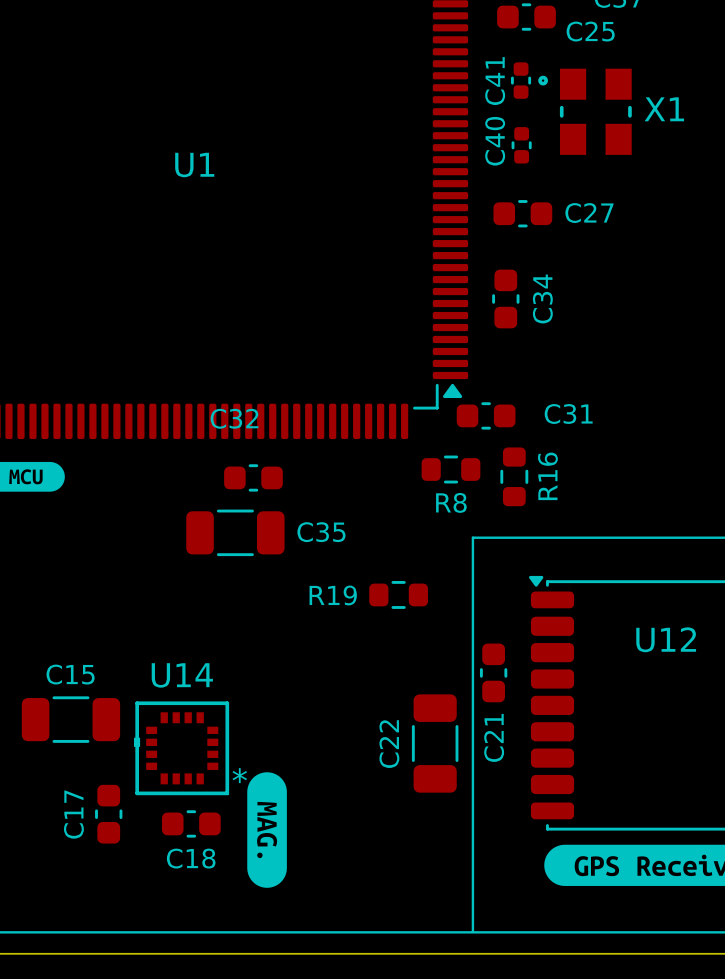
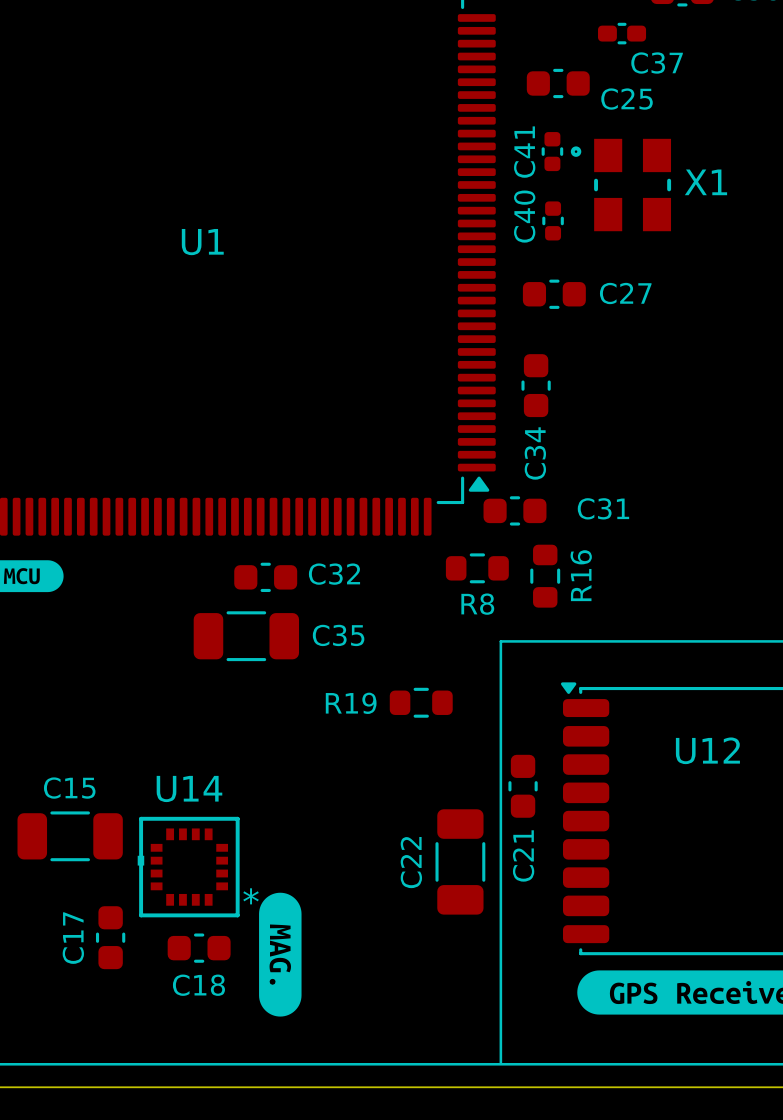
C34 name position: C34 (542, 298) -> C34 (535, 453)
C32 name position: C32 (234, 418) -> C32 (334, 574)

